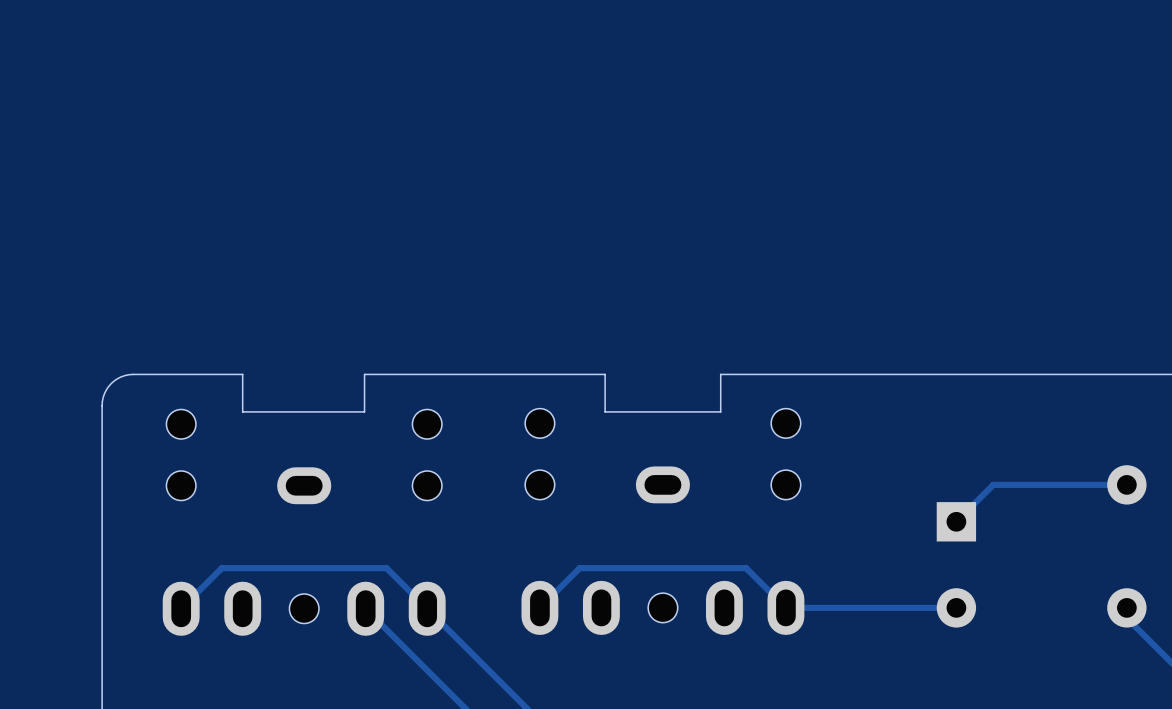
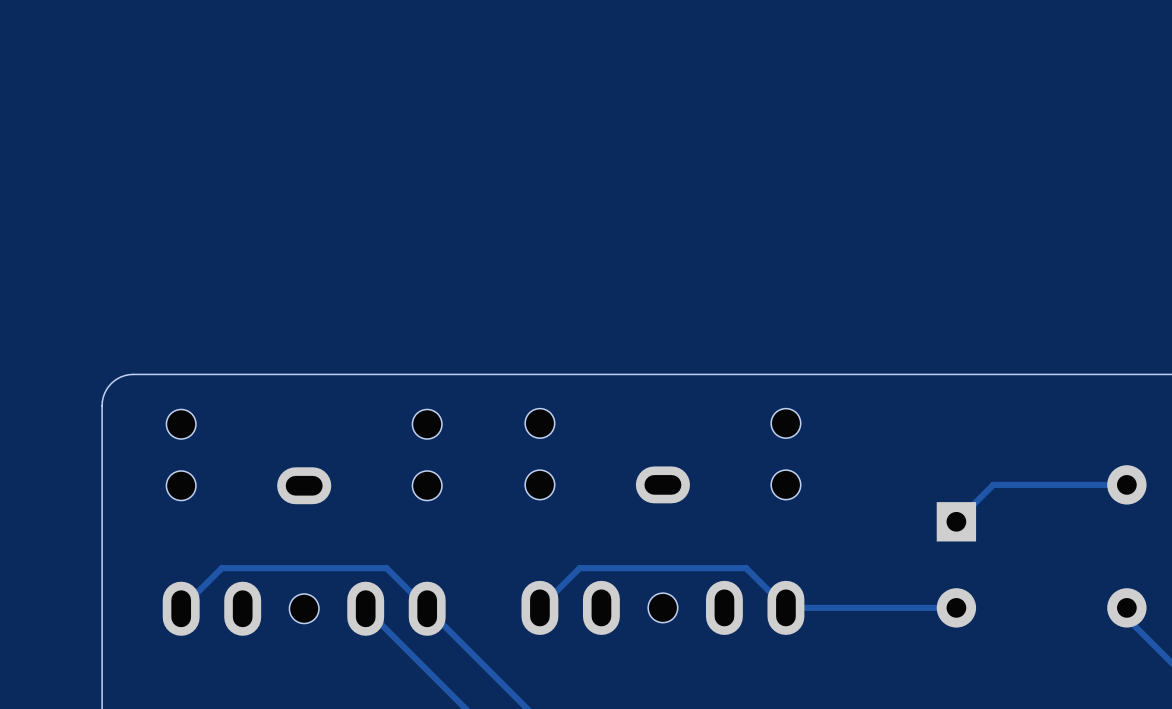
board edge: (364, 374) (364, 411) (242, 411) (242, 374) -> (364, 374) (242, 374)
board edge: (720, 374) (720, 411) (605, 411) (605, 374) -> (720, 374) (605, 374)

